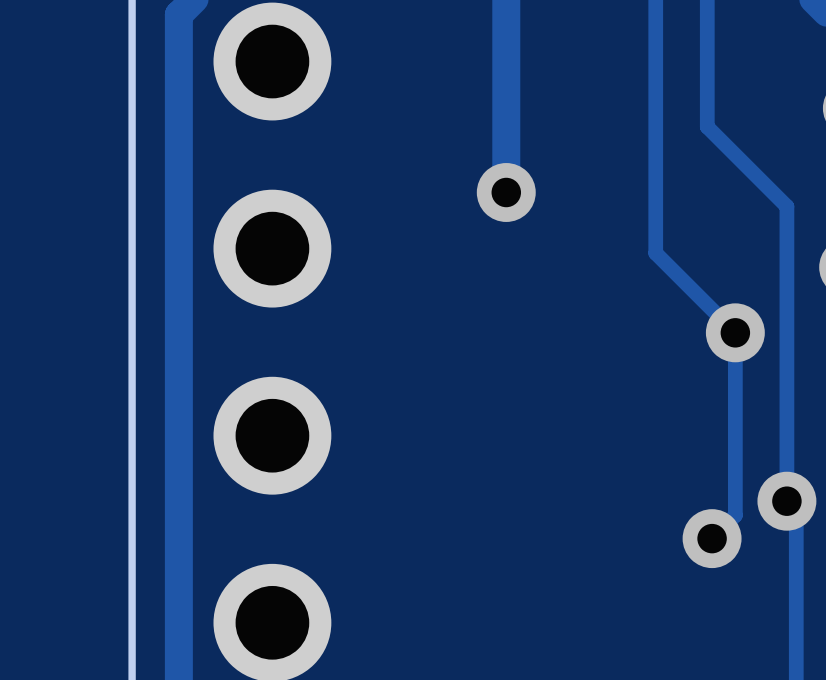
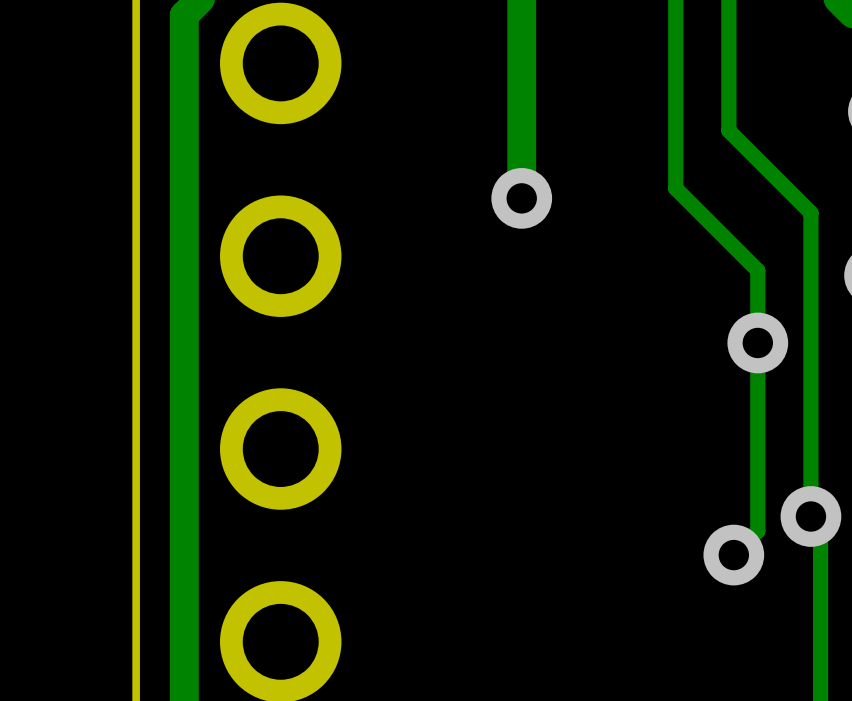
track: (655, 182) (655, 253) (735, 332) -> (675, 188) (757, 270) (757, 342)

